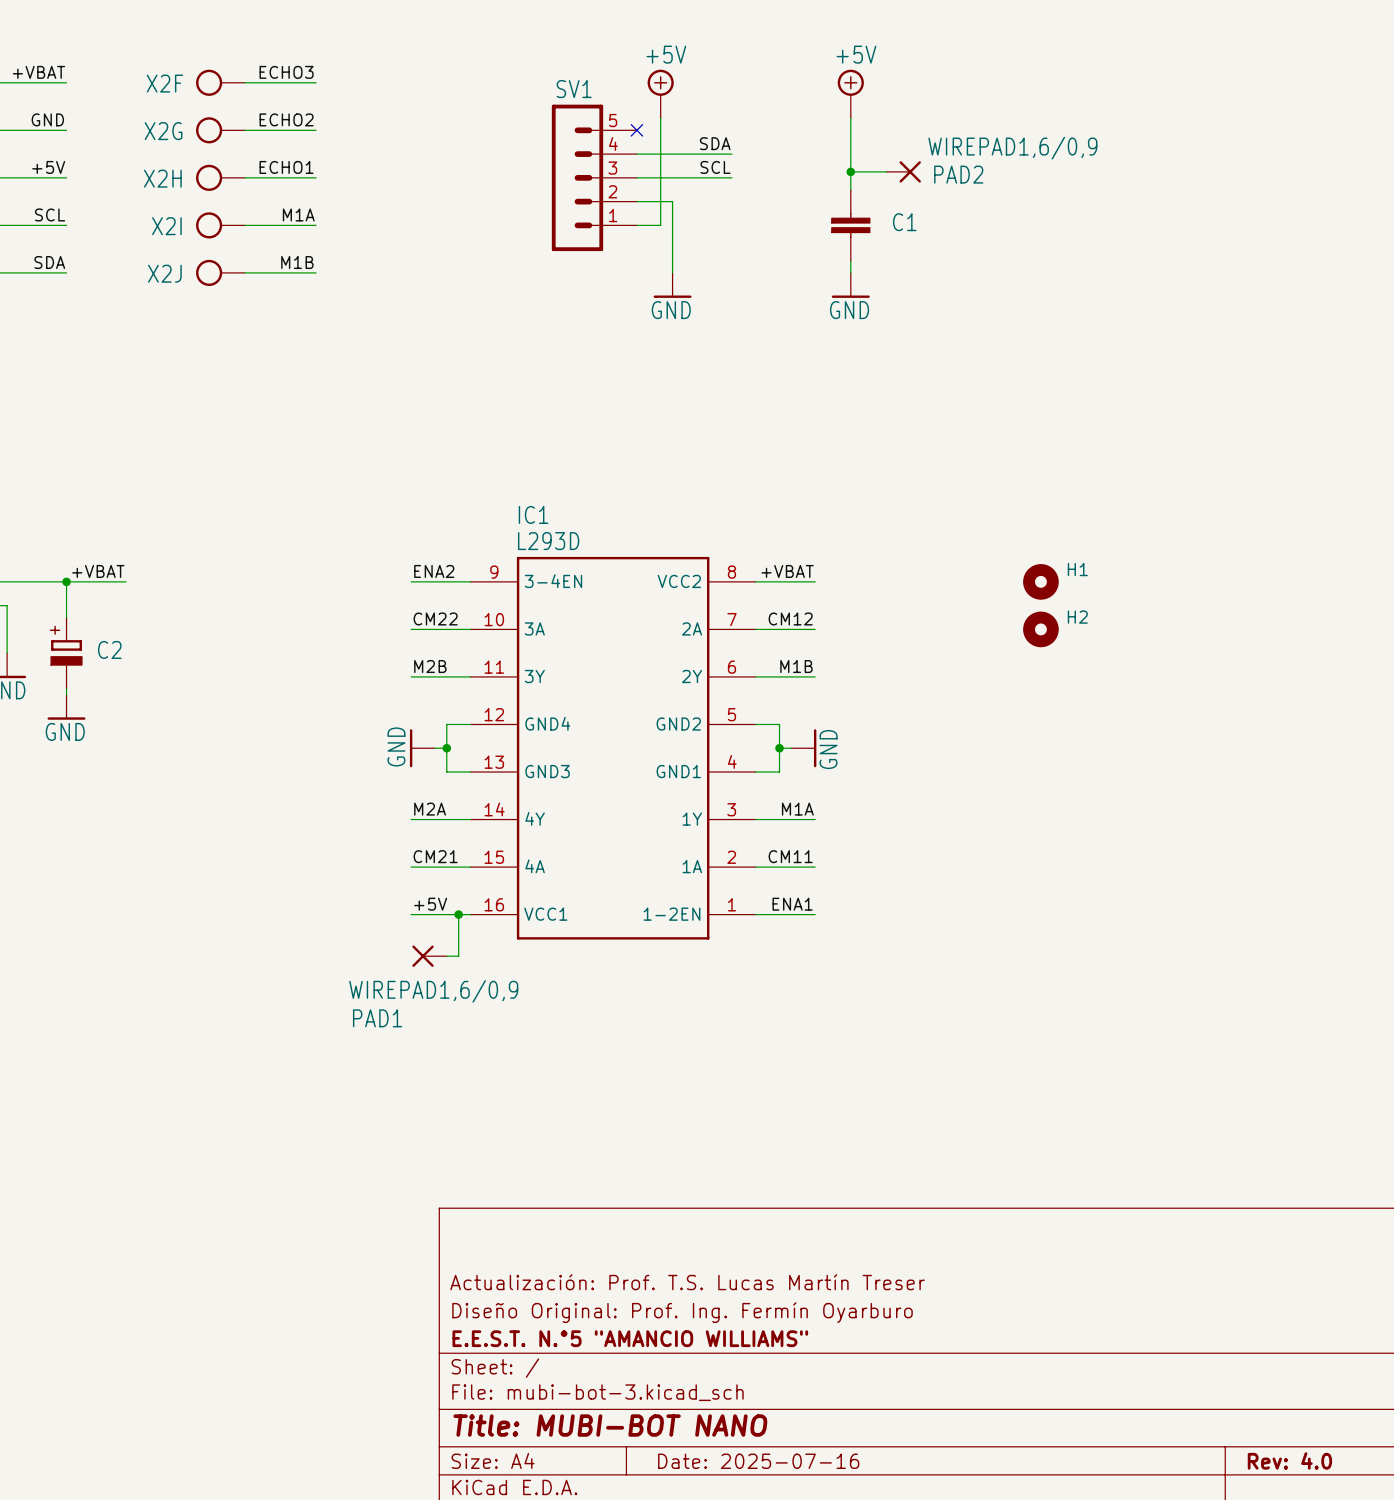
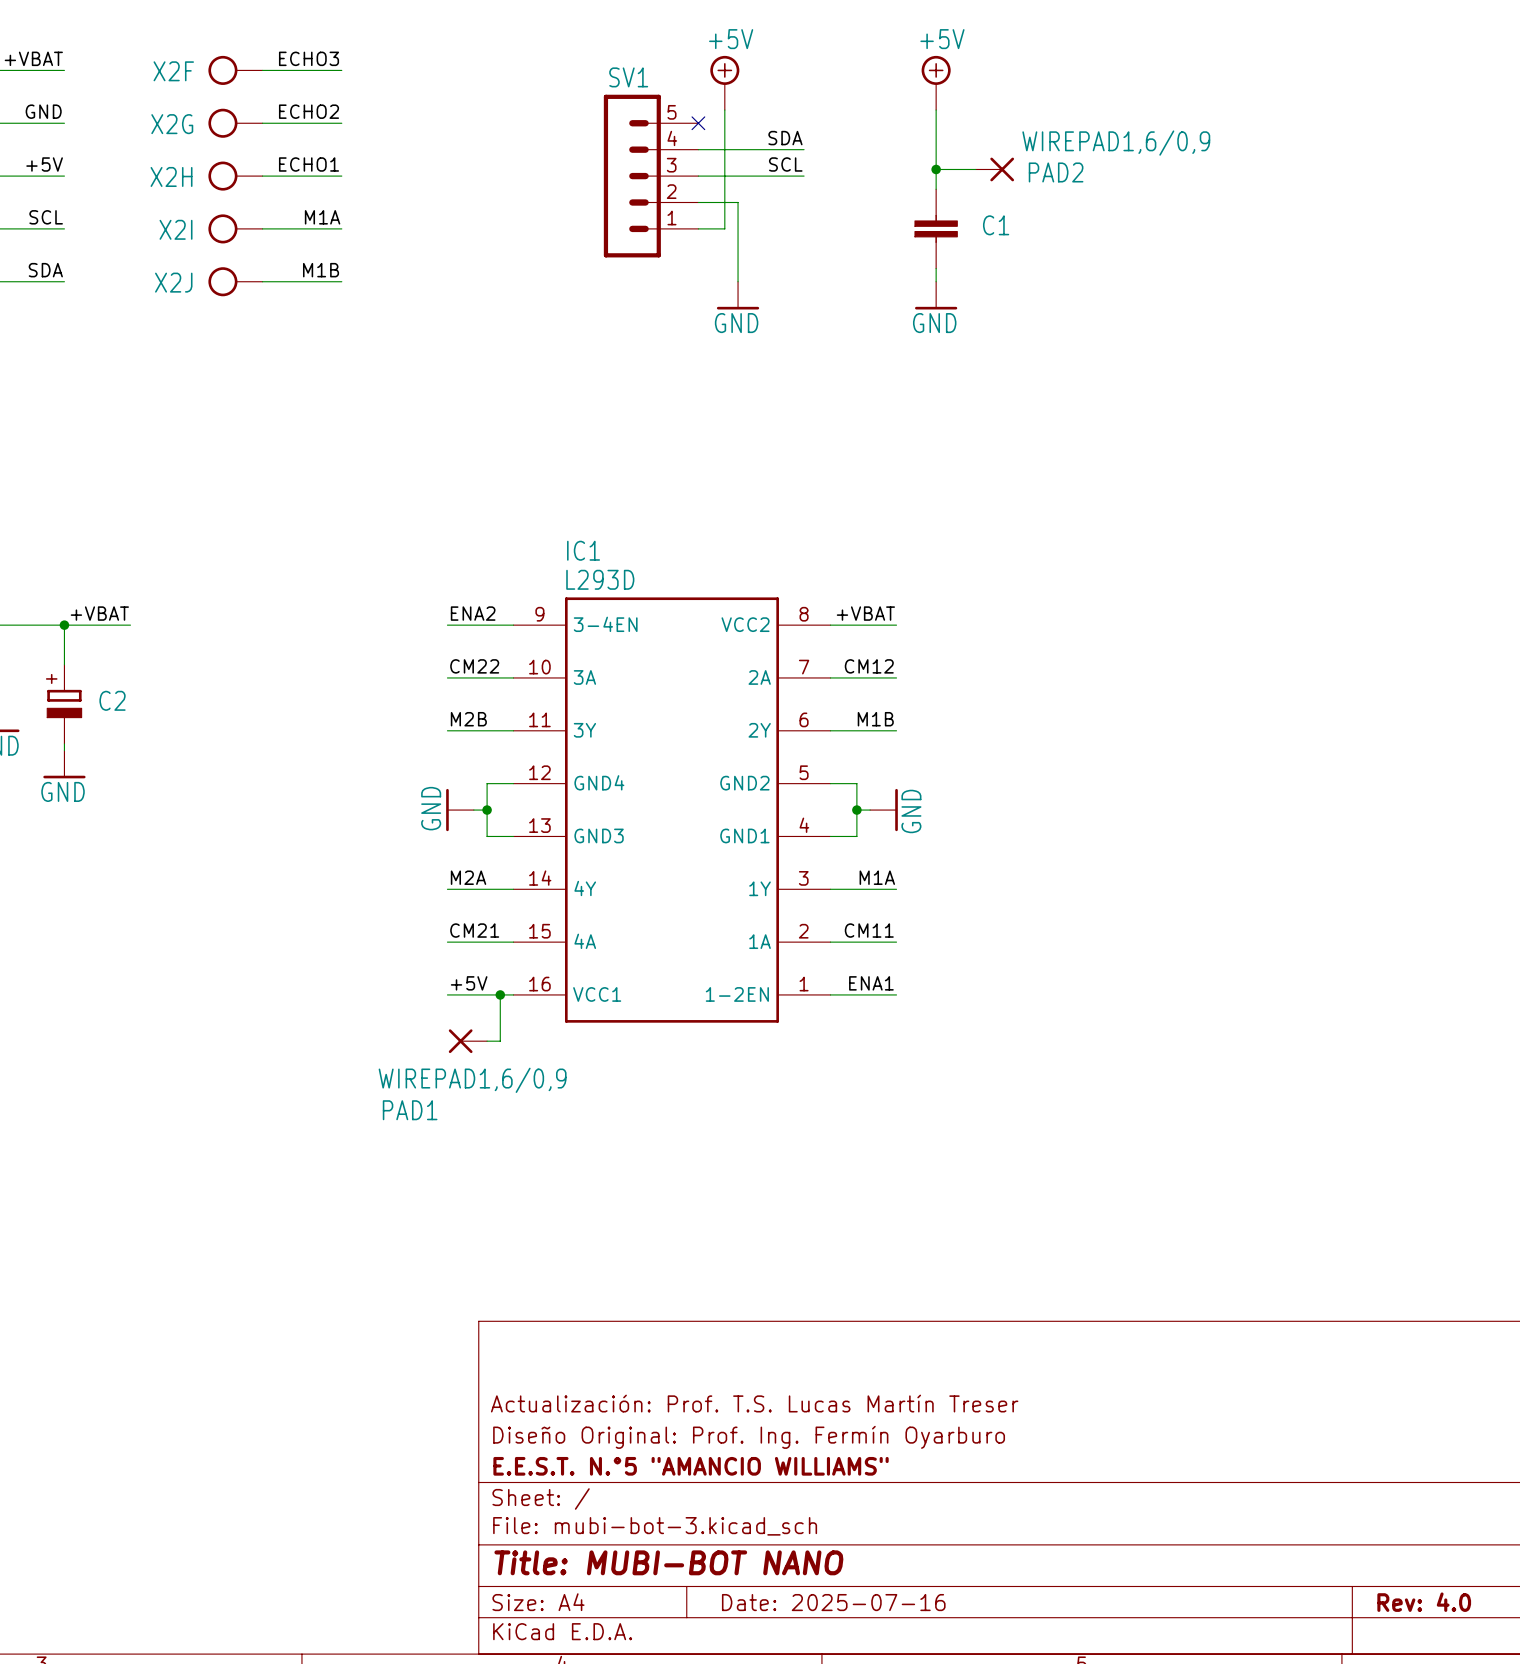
H1: (1040, 581) -> none
H2: (1040, 629) -> none

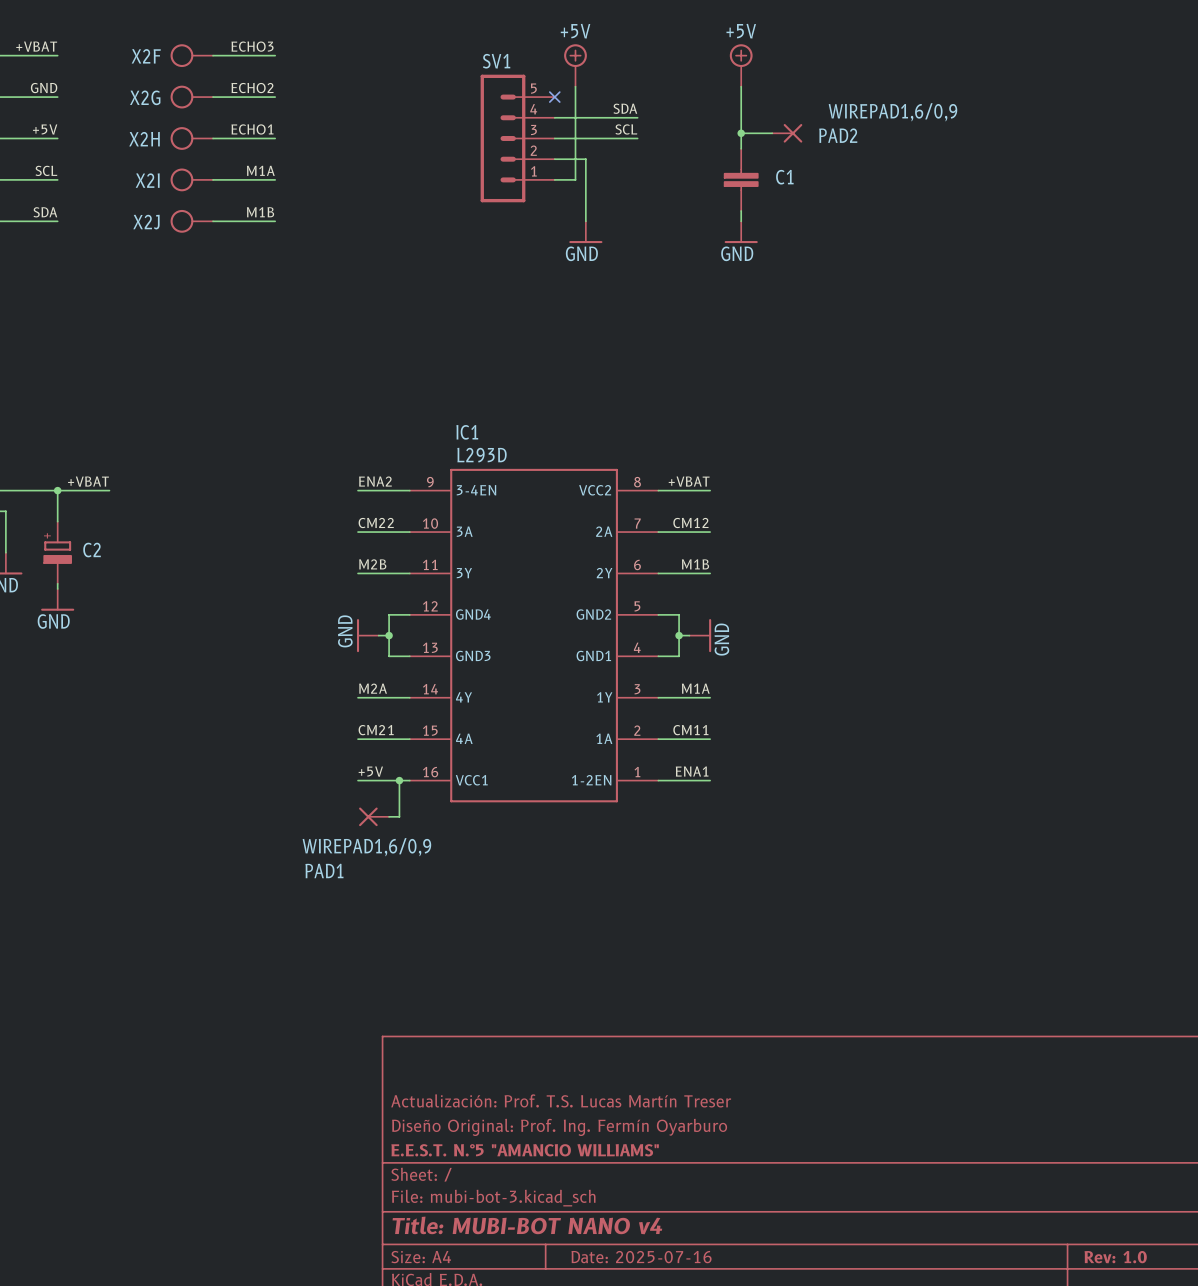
title block: Title: MUBI-BOT NANO (668, 1562) -> Title: MUBI-BOT NANO v4 (527, 1225)
title block: Rev: 4.0 (1424, 1602) -> Rev: 1.0 (1115, 1257)

